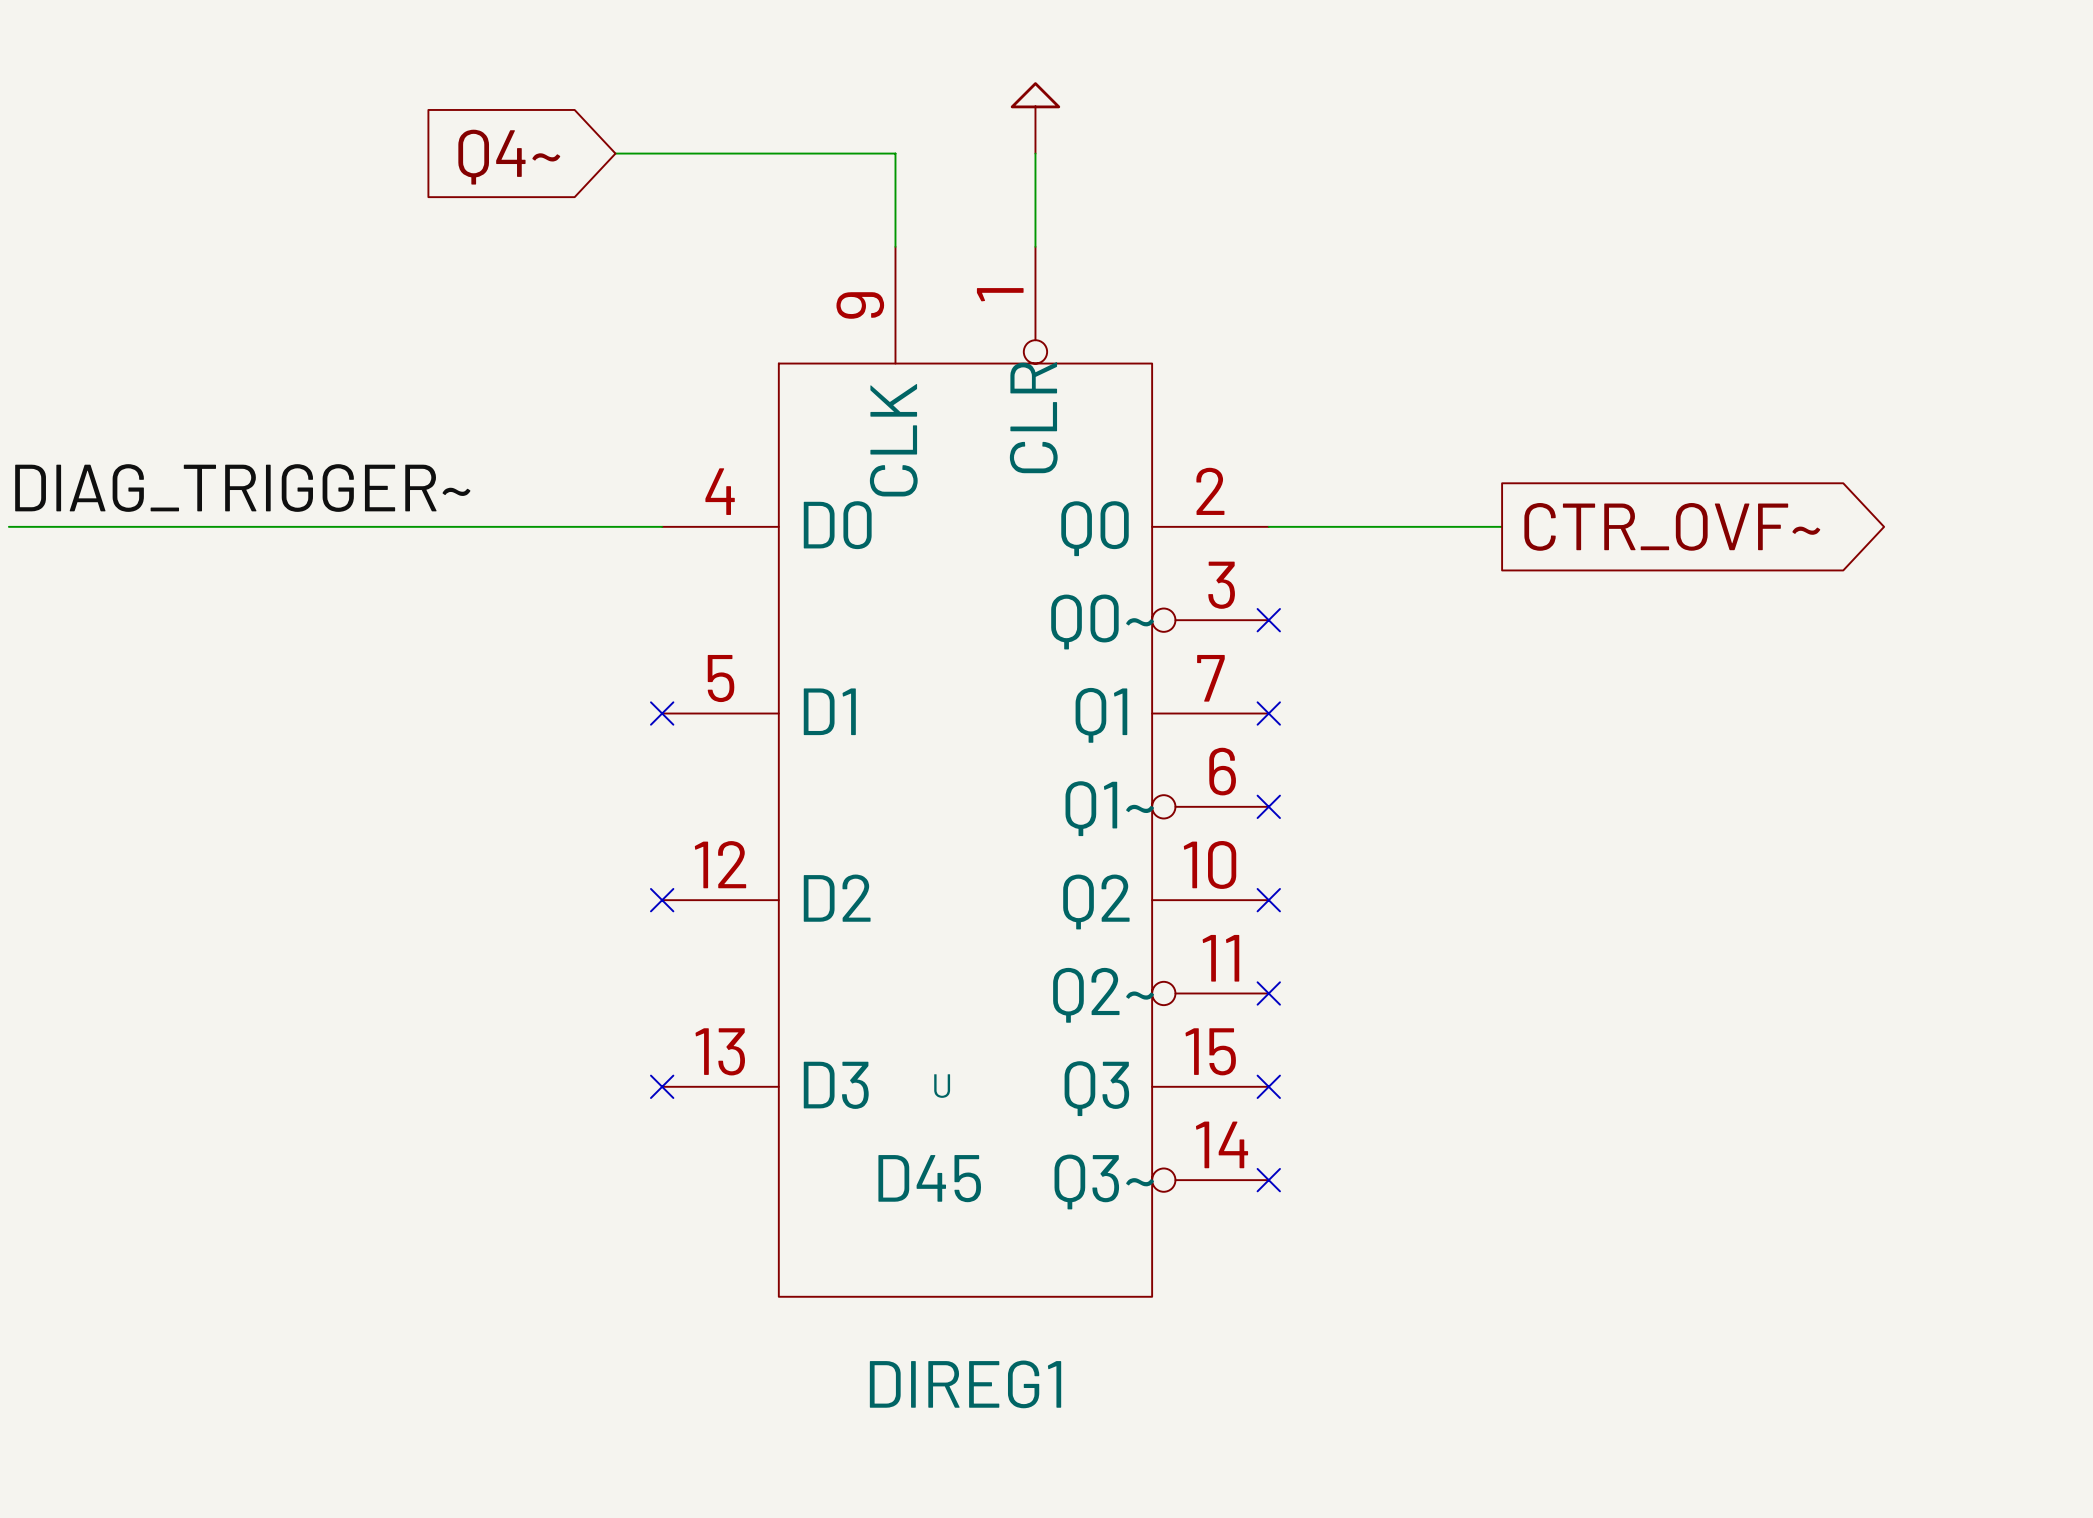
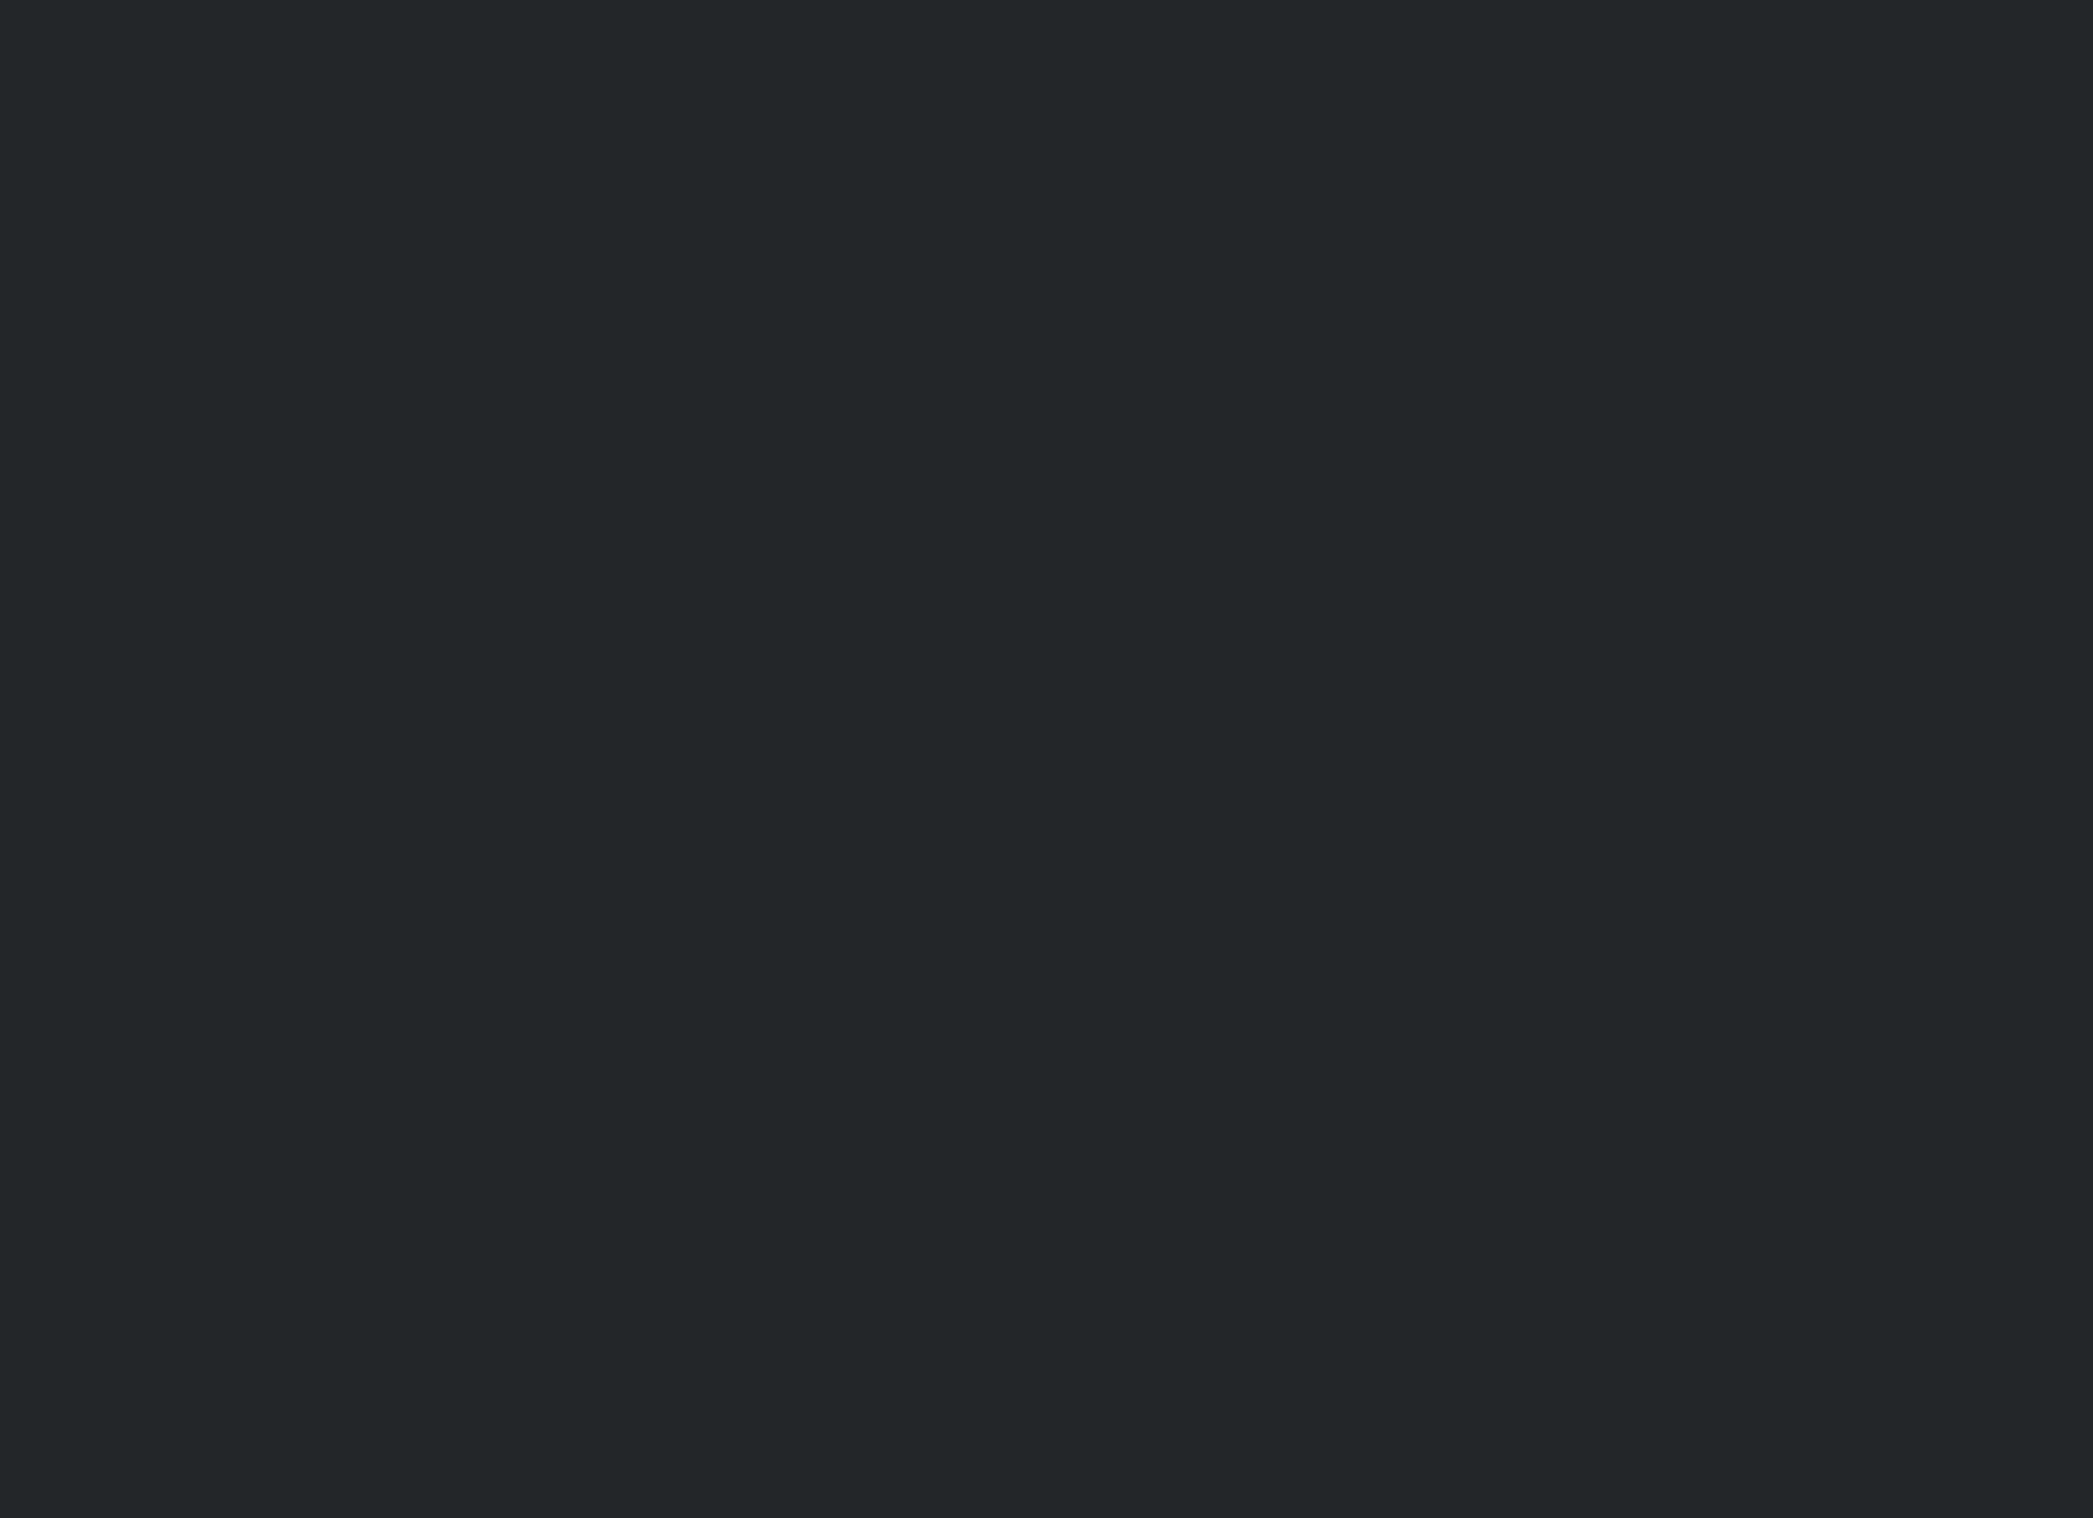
power symbol: (1035, 117) -> none
wire: (615, 153) (895, 153) (895, 246) -> none
wire: (1035, 153) (1035, 246) -> none
global label: Q4~ (509, 157) -> none
label: DIAG_TRIGGER~ (242, 488) -> none
wire: (8, 526) (662, 526) -> none
wire: (1268, 526) (1502, 526) -> none
global label: CTR_OVF~ (1672, 526) -> none
no-connect mark: (1268, 620) -> none
no-connect mark: (662, 713) -> none
no-connect mark: (1268, 713) -> none
U: (965, 771) -> none
no-connect mark: (1268, 806) -> none
no-connect mark: (662, 900) -> none
no-connect mark: (1268, 900) -> none
no-connect mark: (1268, 993) -> none
no-connect mark: (662, 1086) -> none
no-connect mark: (1268, 1086) -> none
no-connect mark: (1268, 1180) -> none

